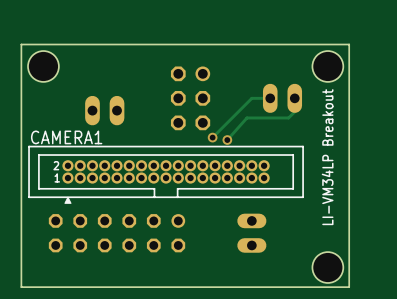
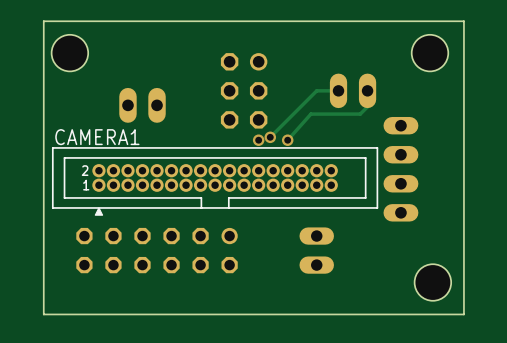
board edge: (21, 44) (349, 44) (349, 287) -> (43, 27) (43, 21) (463, 21) (463, 314) (432, 314)
hole position: (327, 66) -> (429, 53)
via: none -> (258, 140)
text: LI-VM34LP Breakout (327, 157) -> none
part: none -> (400, 169)
hole position: (327, 267) -> (432, 282)

